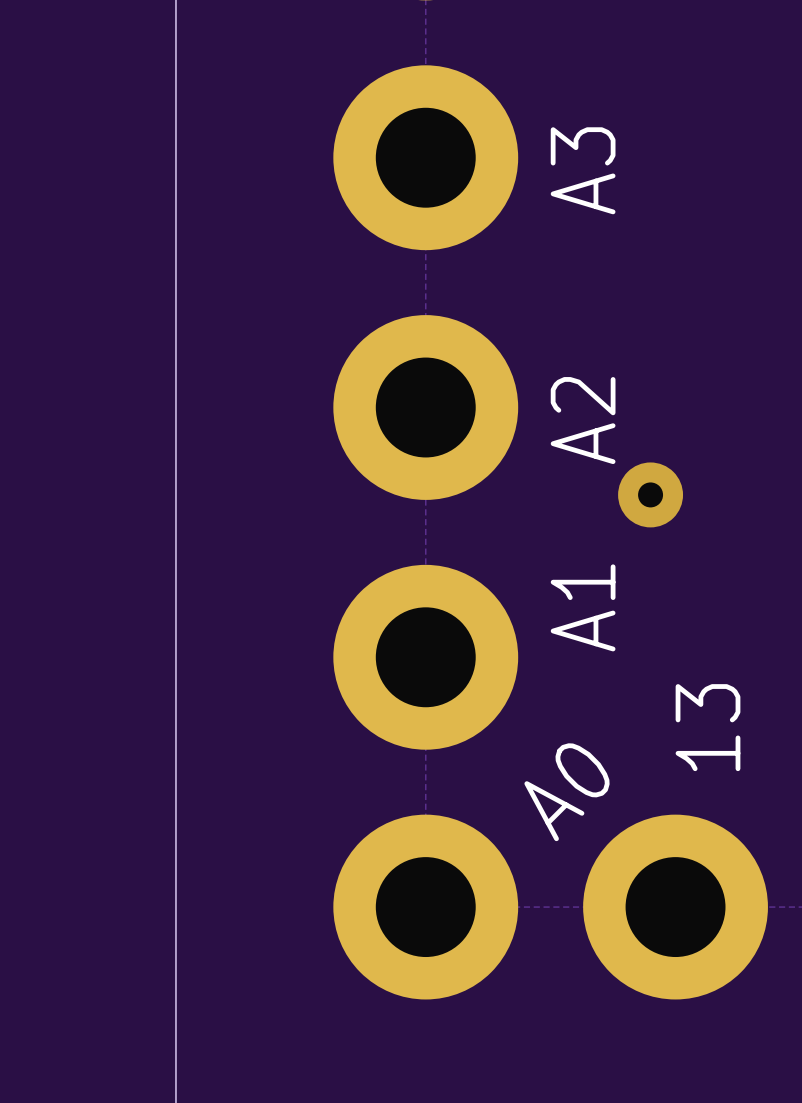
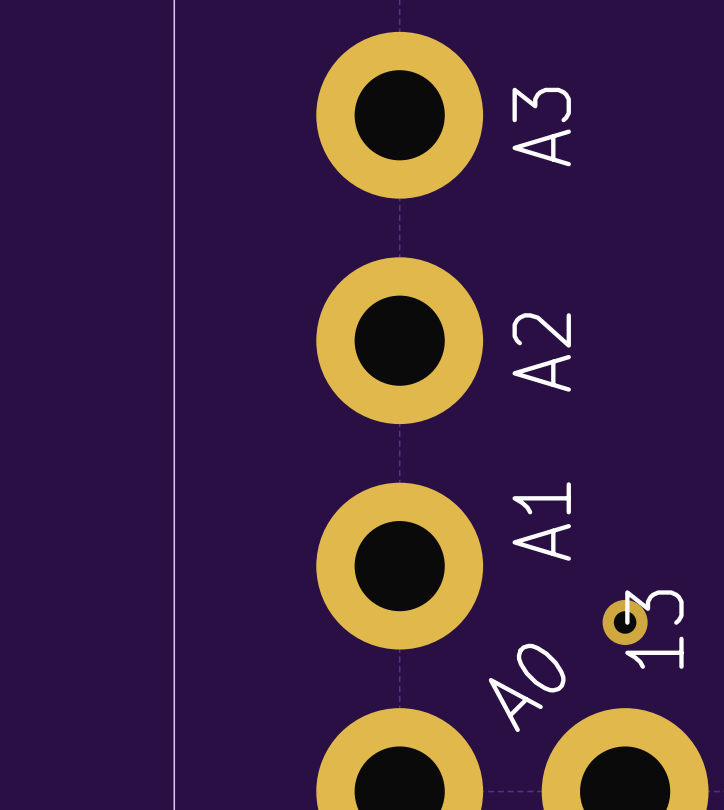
via: (650, 494) -> none
via: none -> (625, 622)

